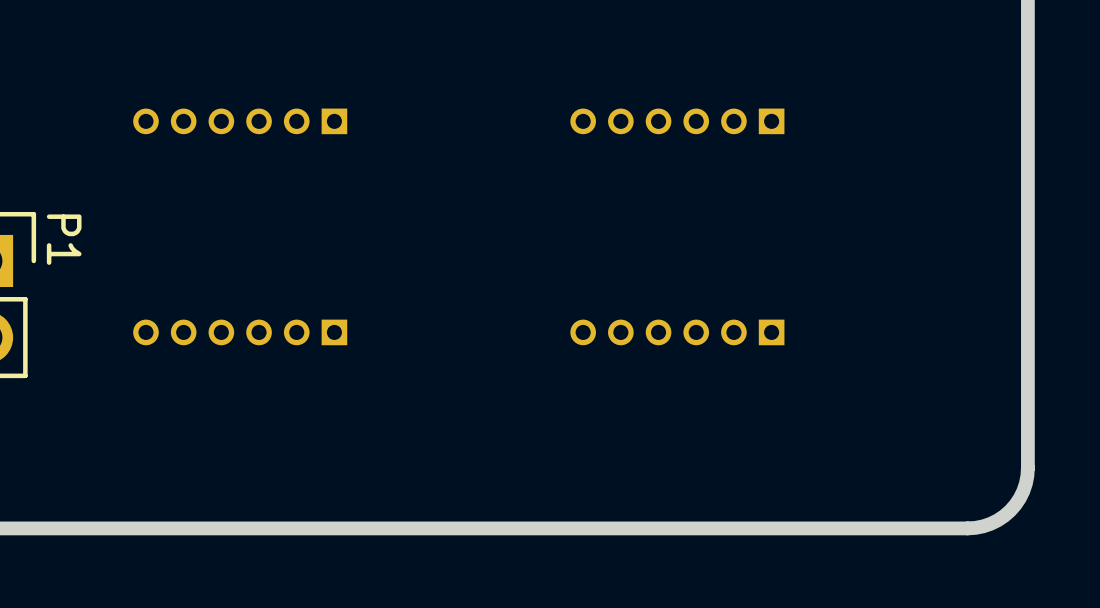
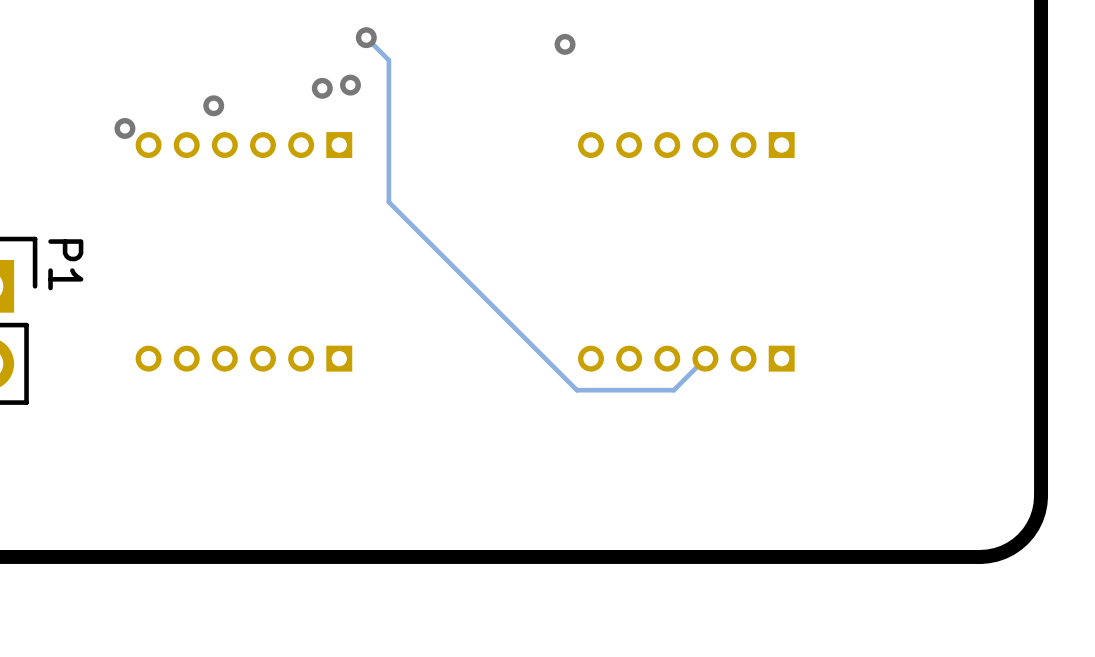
track: none -> (366, 37) (388, 60) (388, 202) (576, 390) (673, 390) (705, 358)
via: none -> (366, 37)
via: none -> (565, 44)
via: none -> (350, 85)
via: none -> (322, 88)
via: none -> (213, 105)
via: none -> (124, 128)

